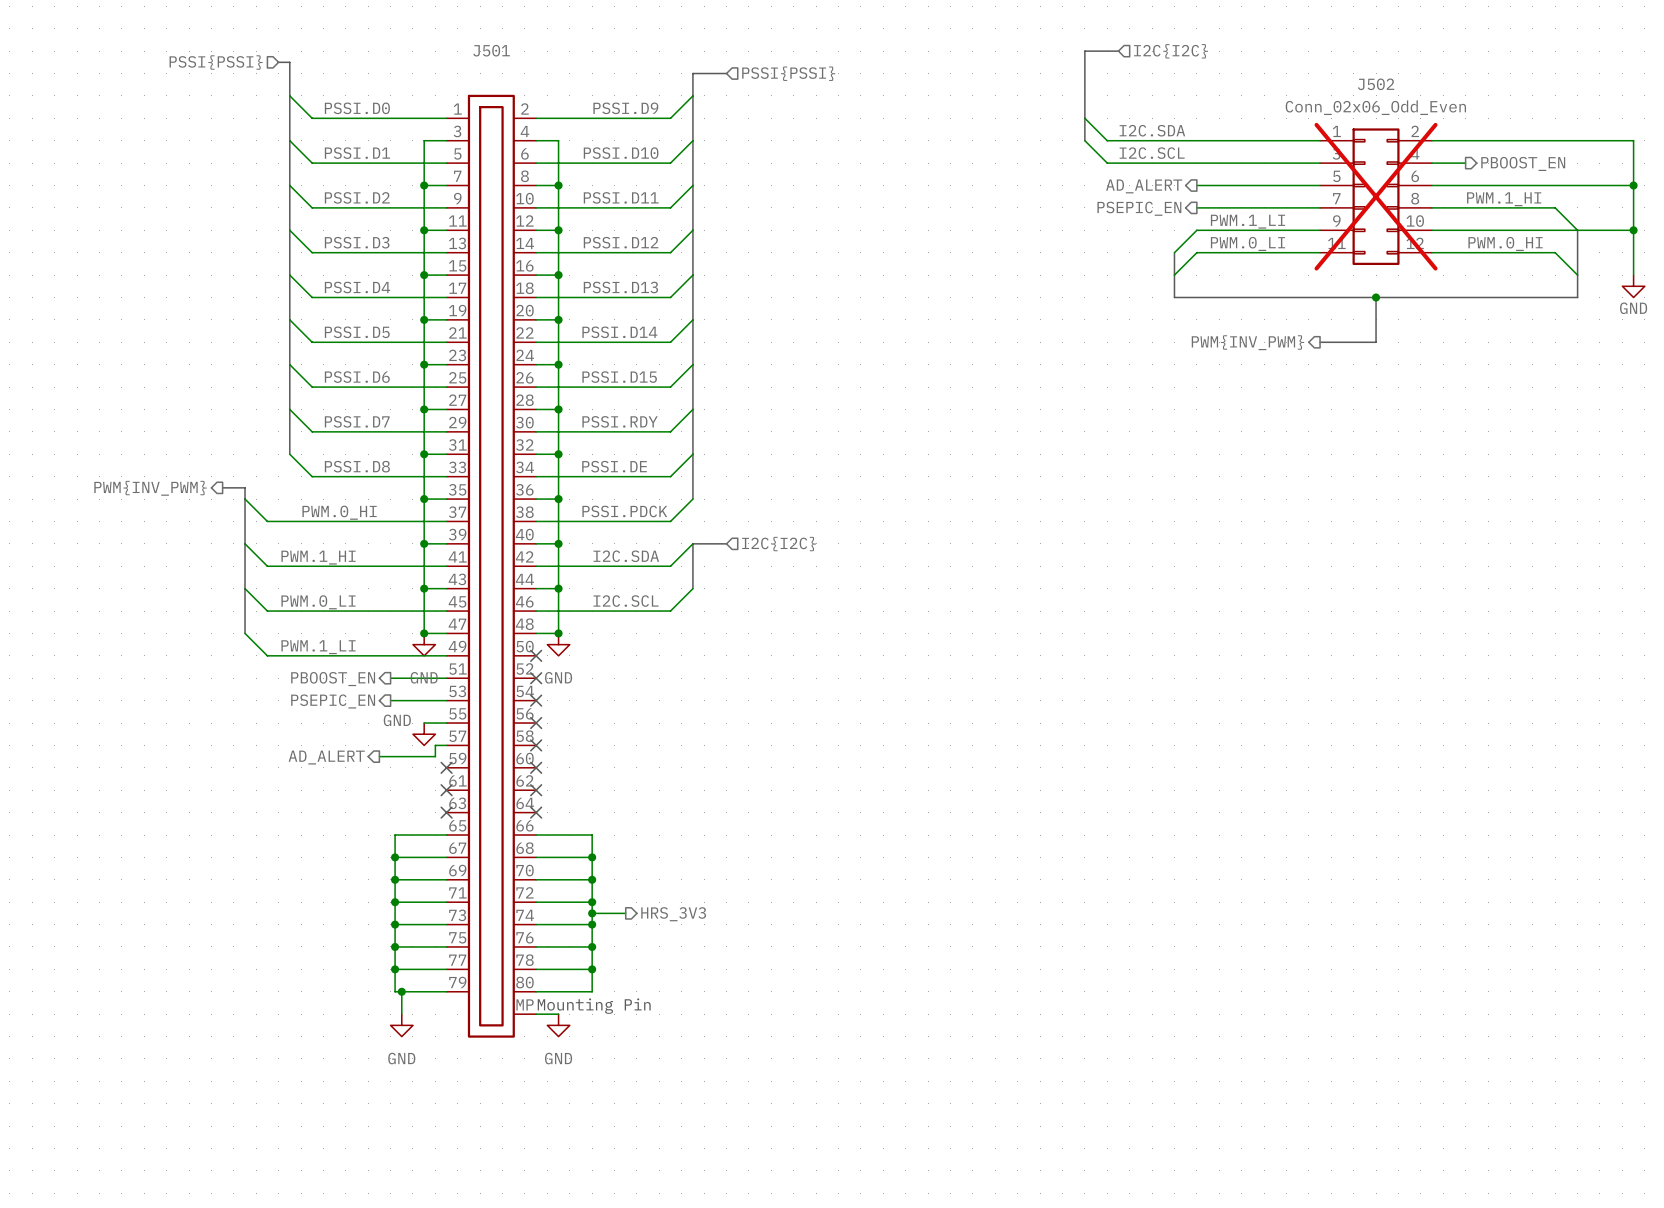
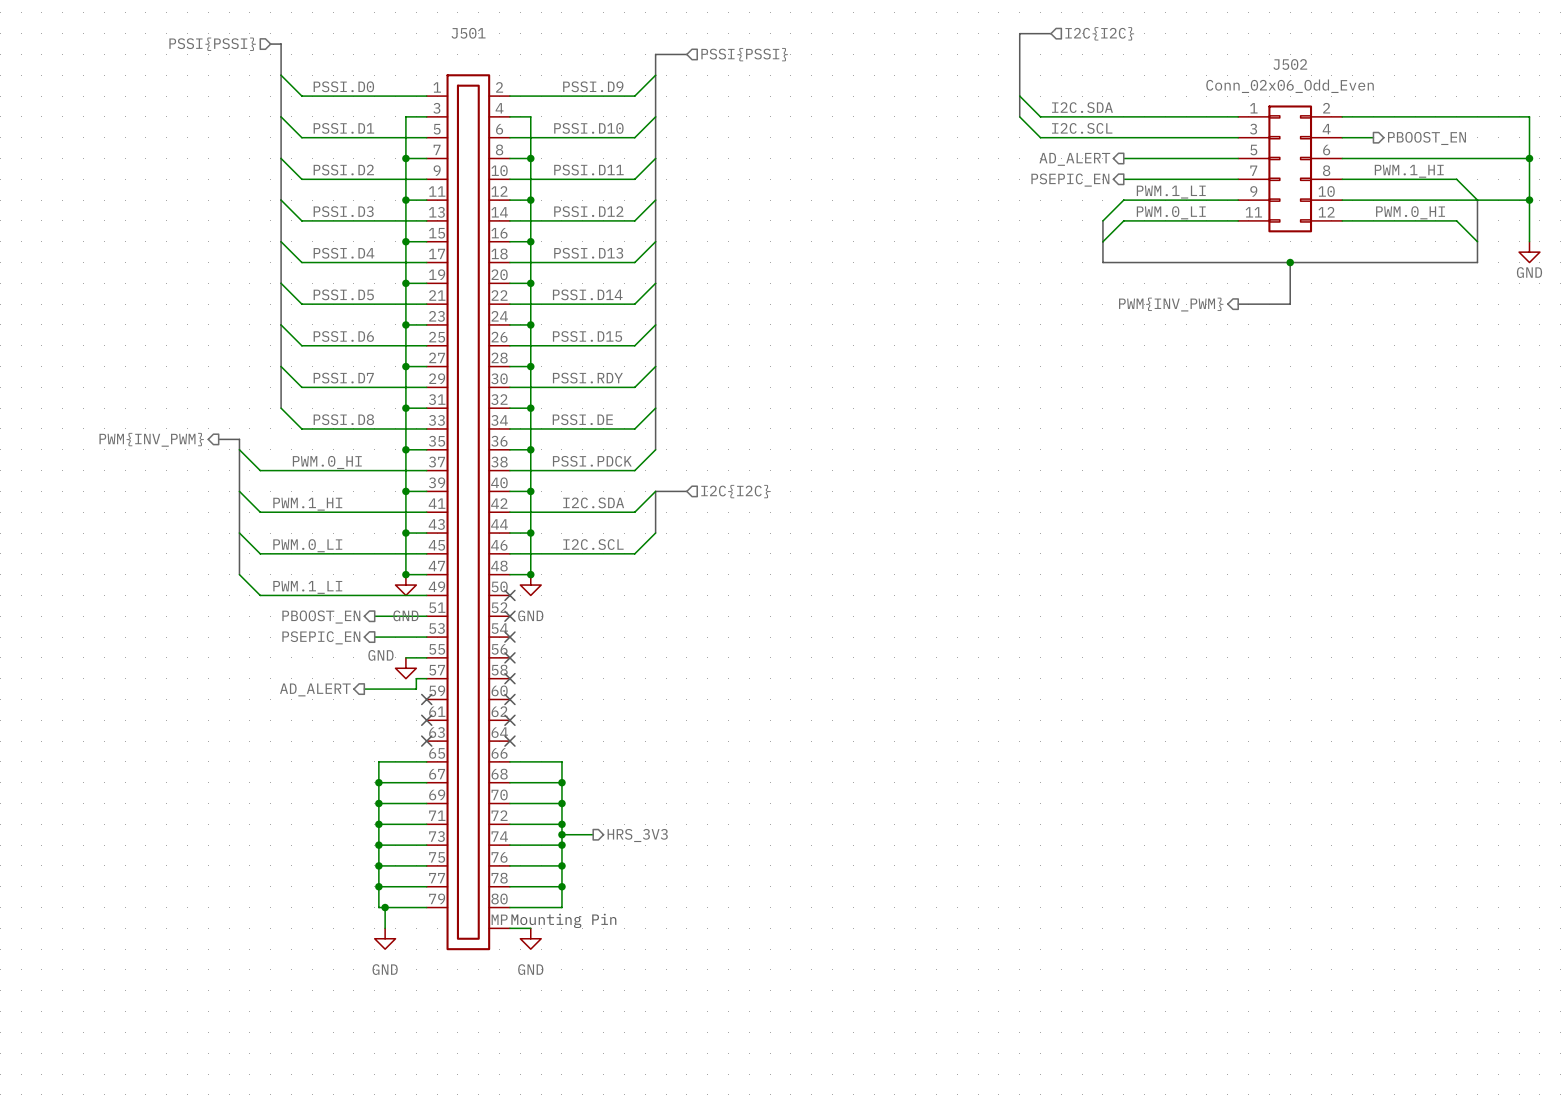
J502 do-not-place cross: (1376, 196) -> none

